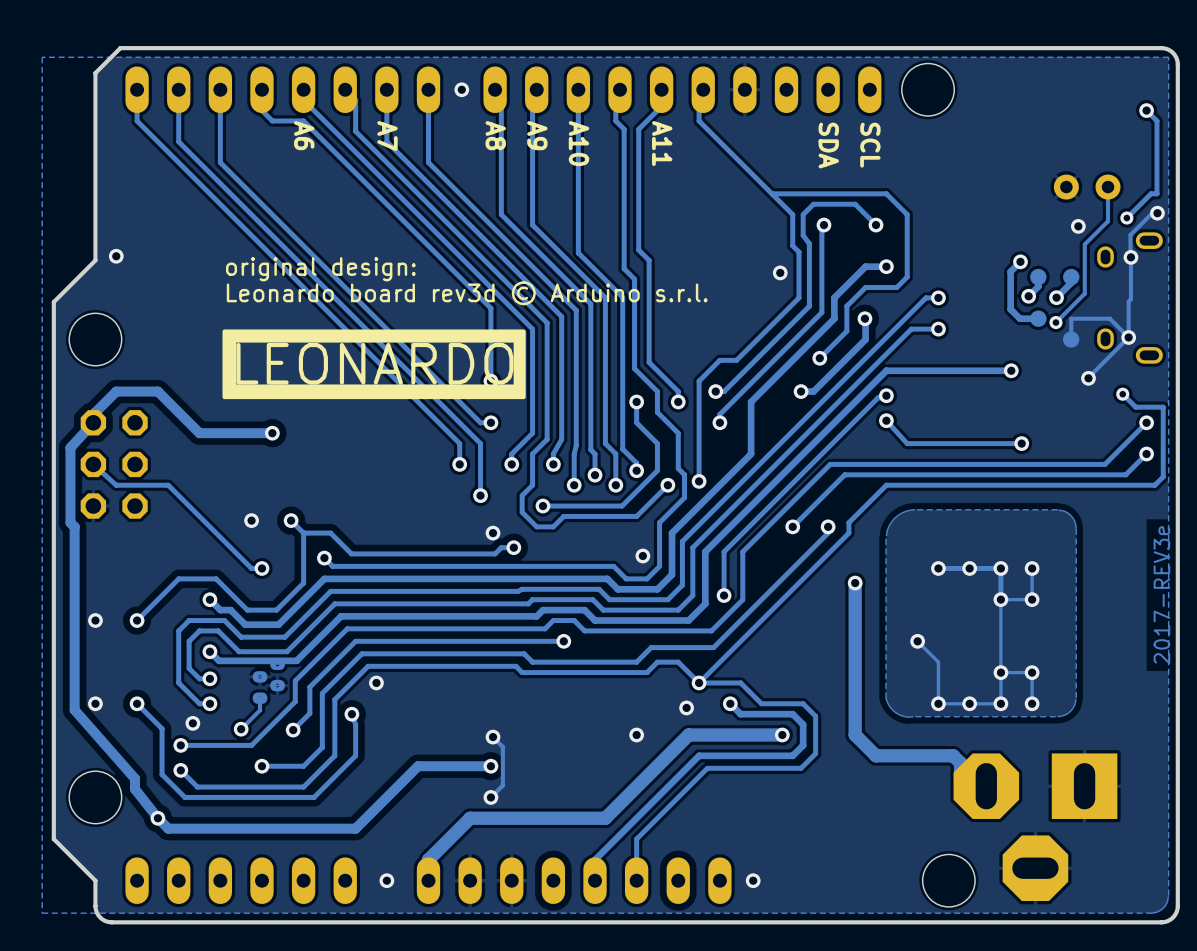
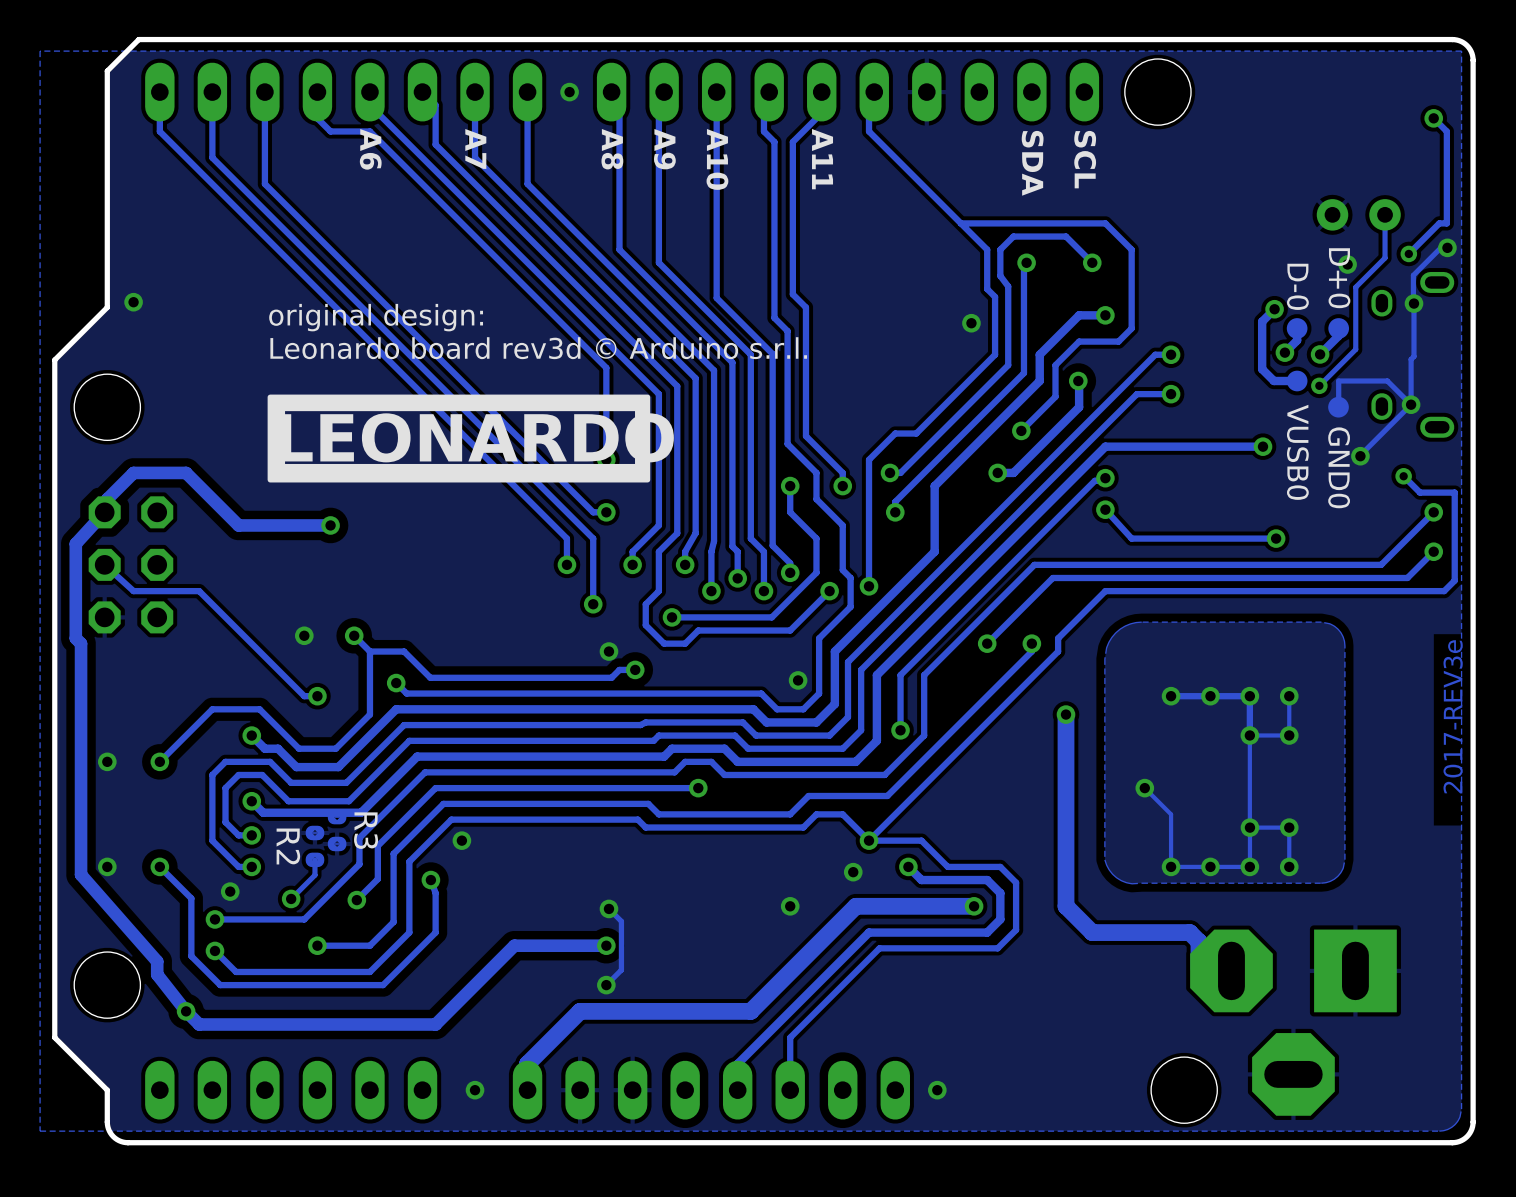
D+0 name: none -> D+0 (1339, 278)
D-0 name: none -> D-0 (1297, 286)
VUSB0 name: none -> VUSB0 (1297, 452)
GND0 name: none -> GND0 (1339, 467)
R3 name: none -> R3 (366, 830)
R2 name: none -> R2 (288, 846)

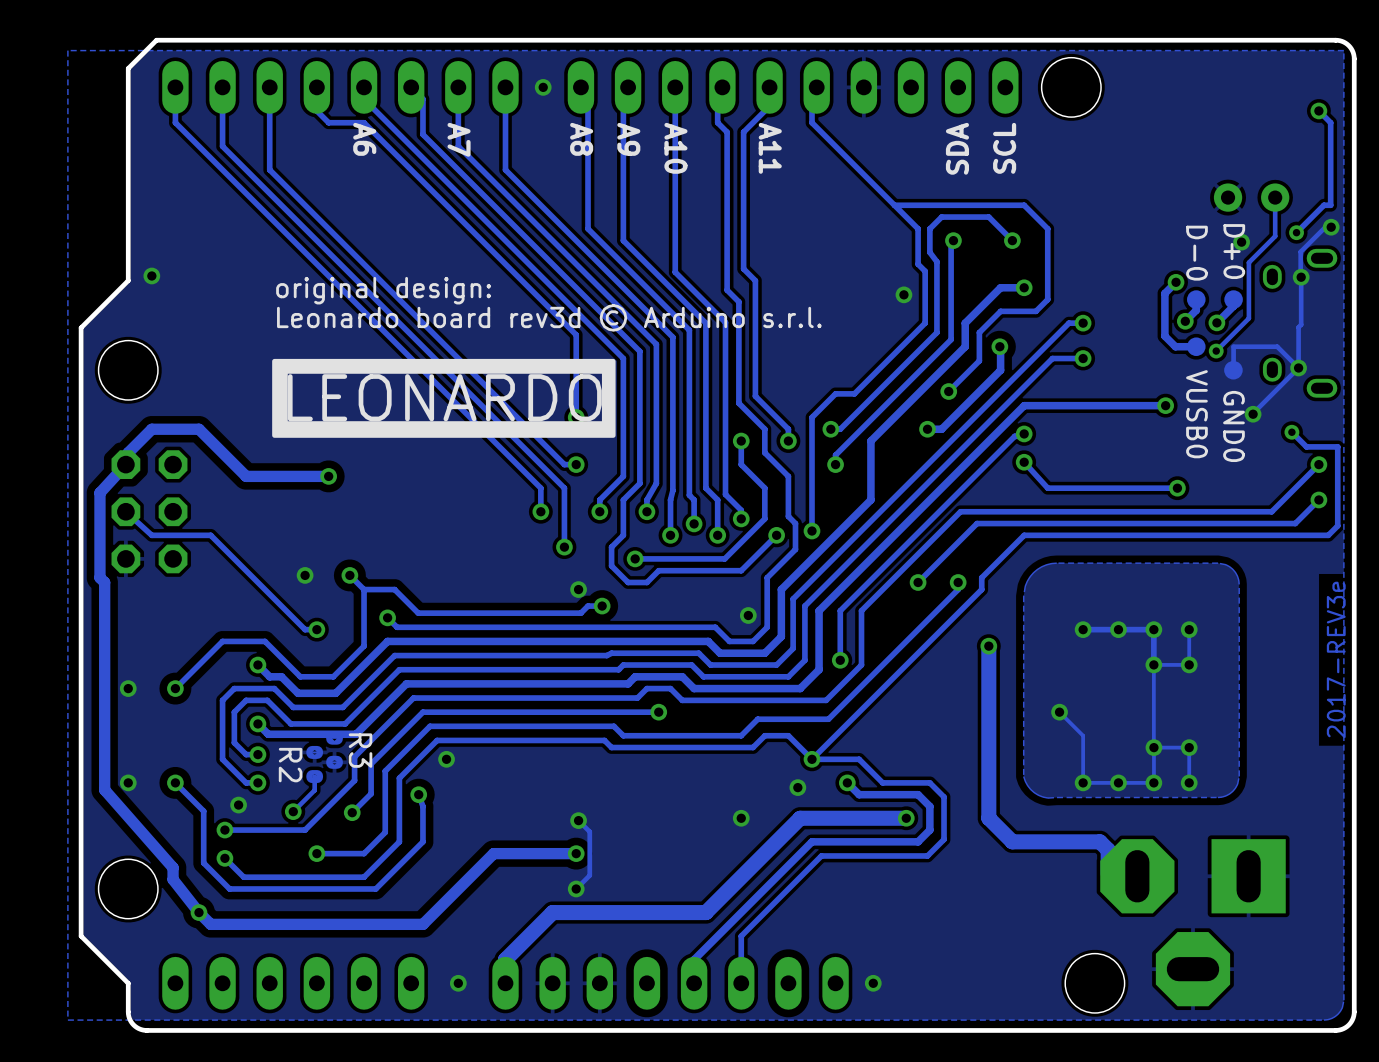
text rotation: 0° (1085, 159) -> 180° (1004, 148)
text rotation: 0° (1032, 163) -> 180° (957, 148)

